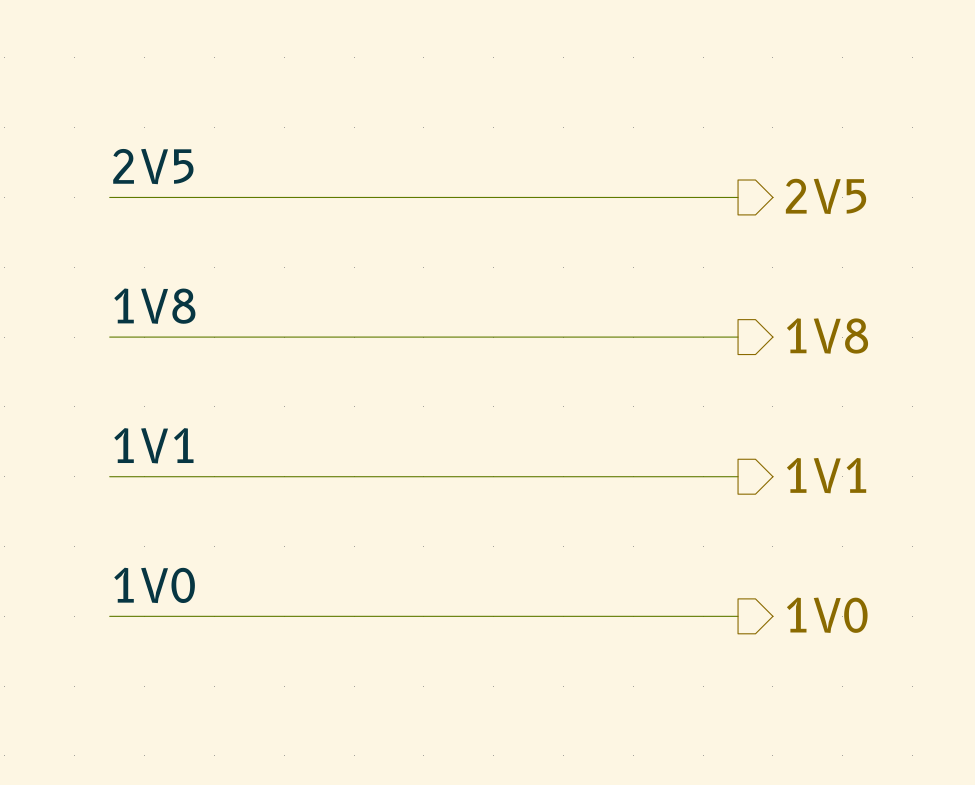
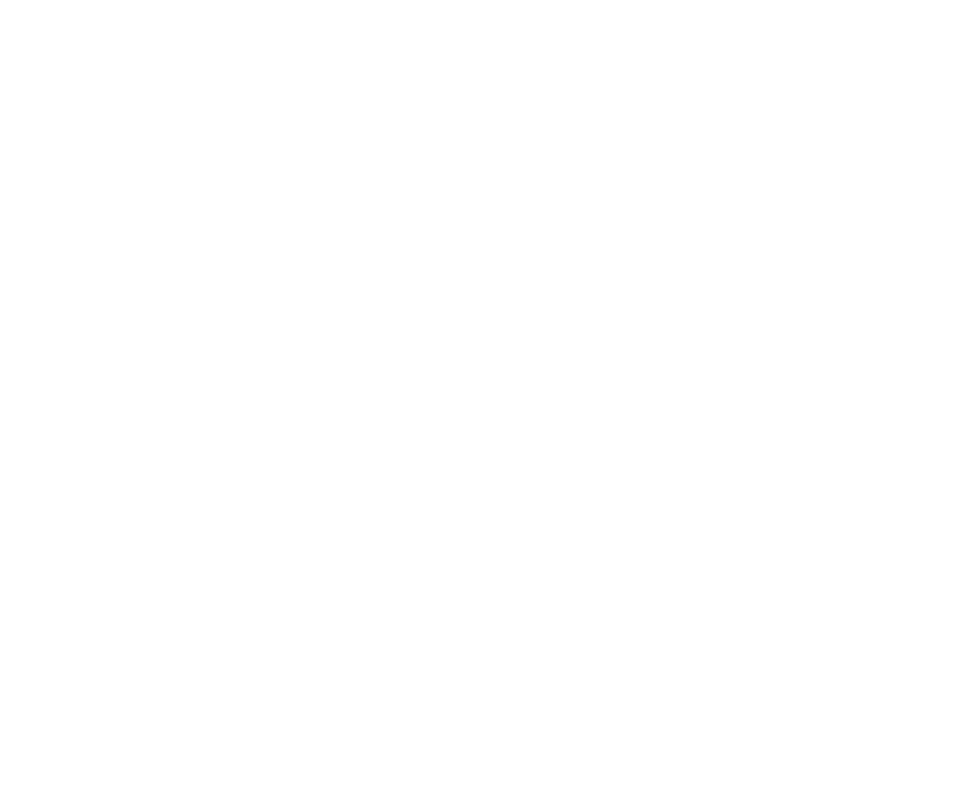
label: 2V5 (153, 166) -> none
hierarchical label: 2V5 (826, 196) -> none
wire: (109, 197) (738, 197) -> none
label: 1V8 (154, 306) -> none
hierarchical label: 1V8 (827, 336) -> none
wire: (109, 337) (738, 337) -> none
label: 1V1 (153, 445) -> none
hierarchical label: 1V1 (826, 475) -> none
wire: (109, 476) (738, 476) -> none
label: 1V0 (154, 585) -> none
hierarchical label: 1V0 (827, 615) -> none
wire: (109, 616) (738, 616) -> none

